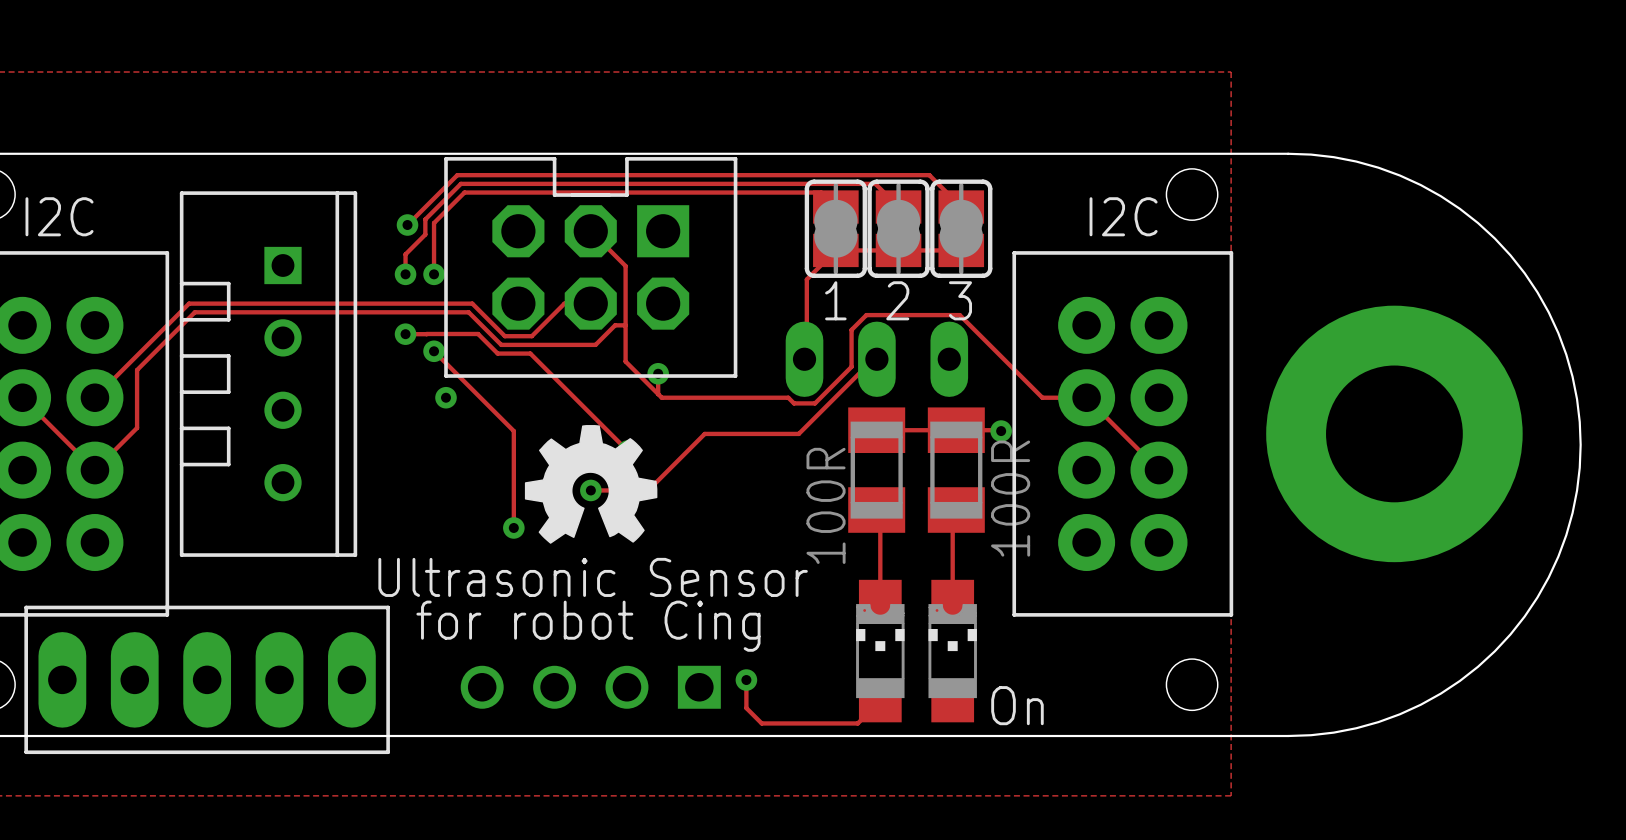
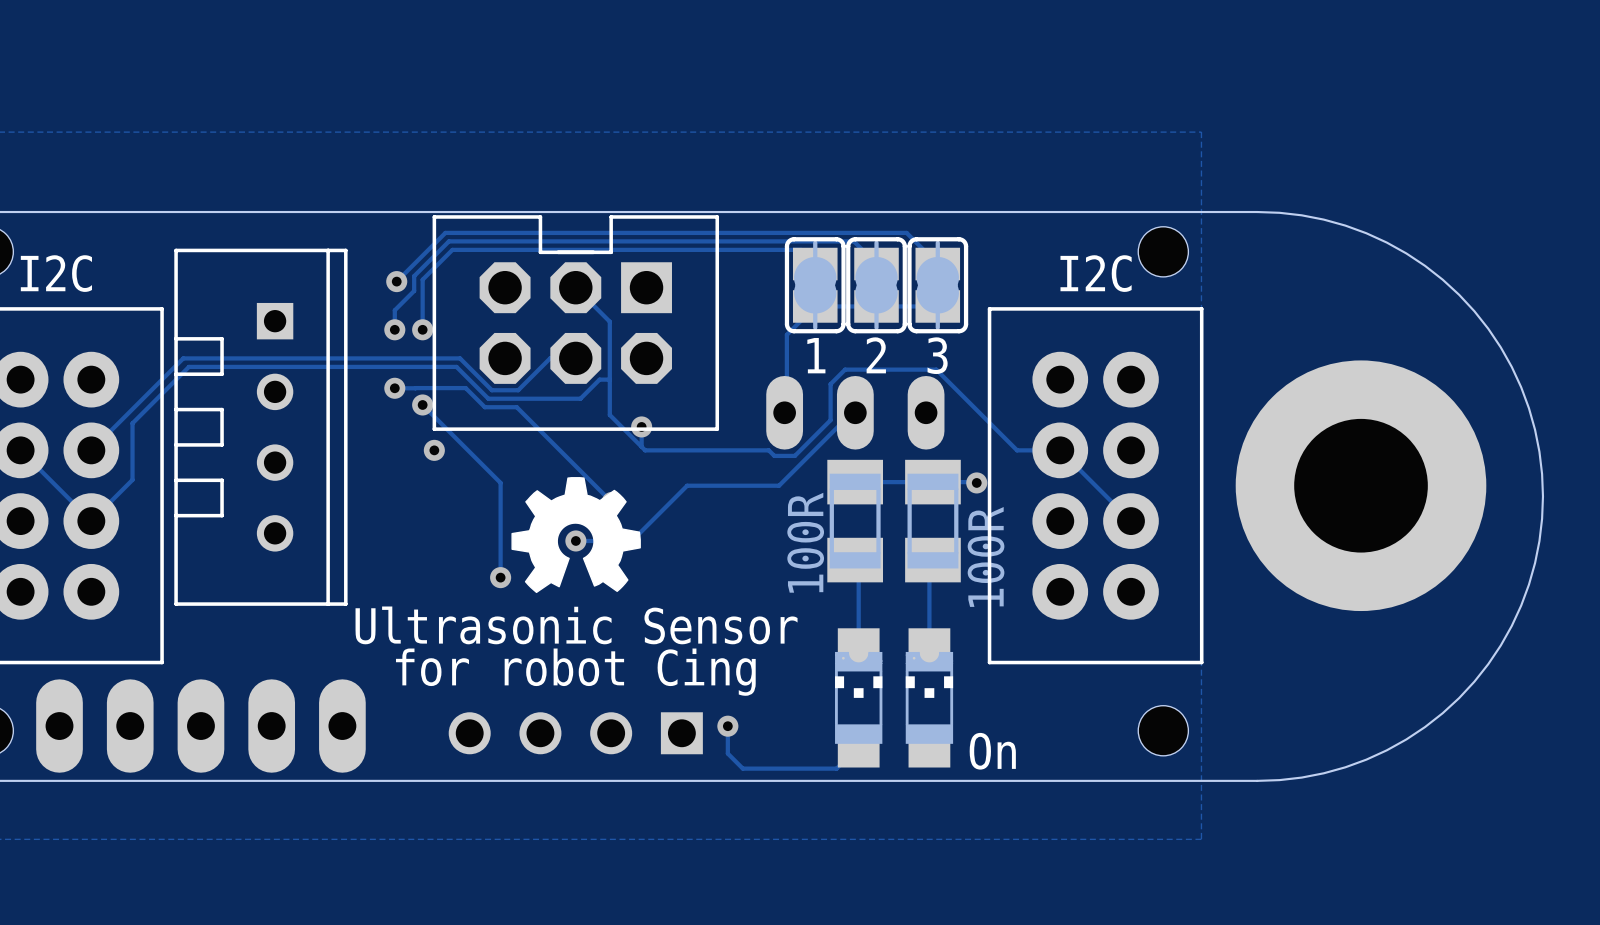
part side: top (207, 679) -> bottom (200, 726)

